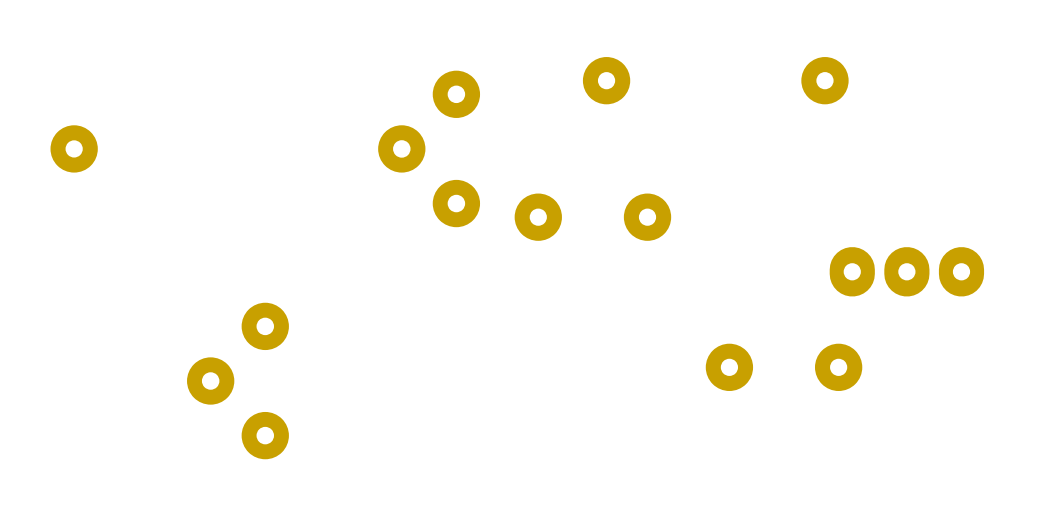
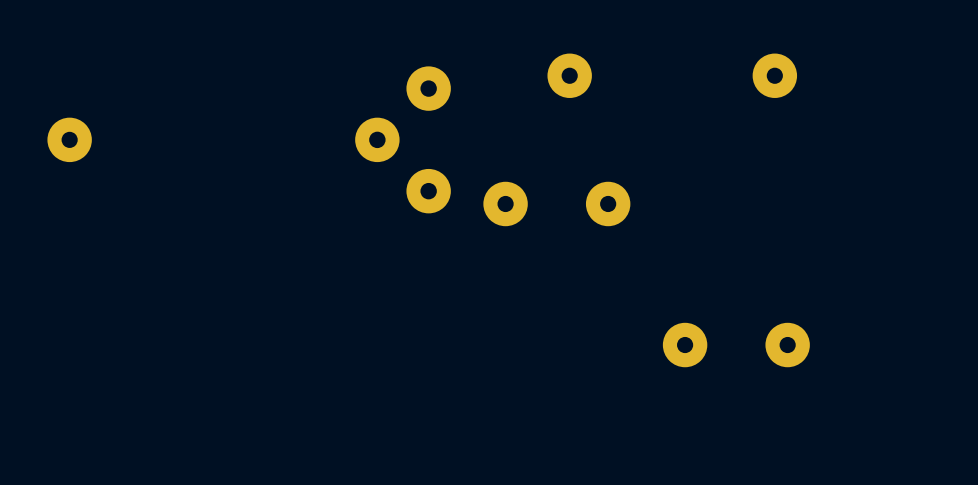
part: (906, 271) -> none
part: (237, 381) -> none

